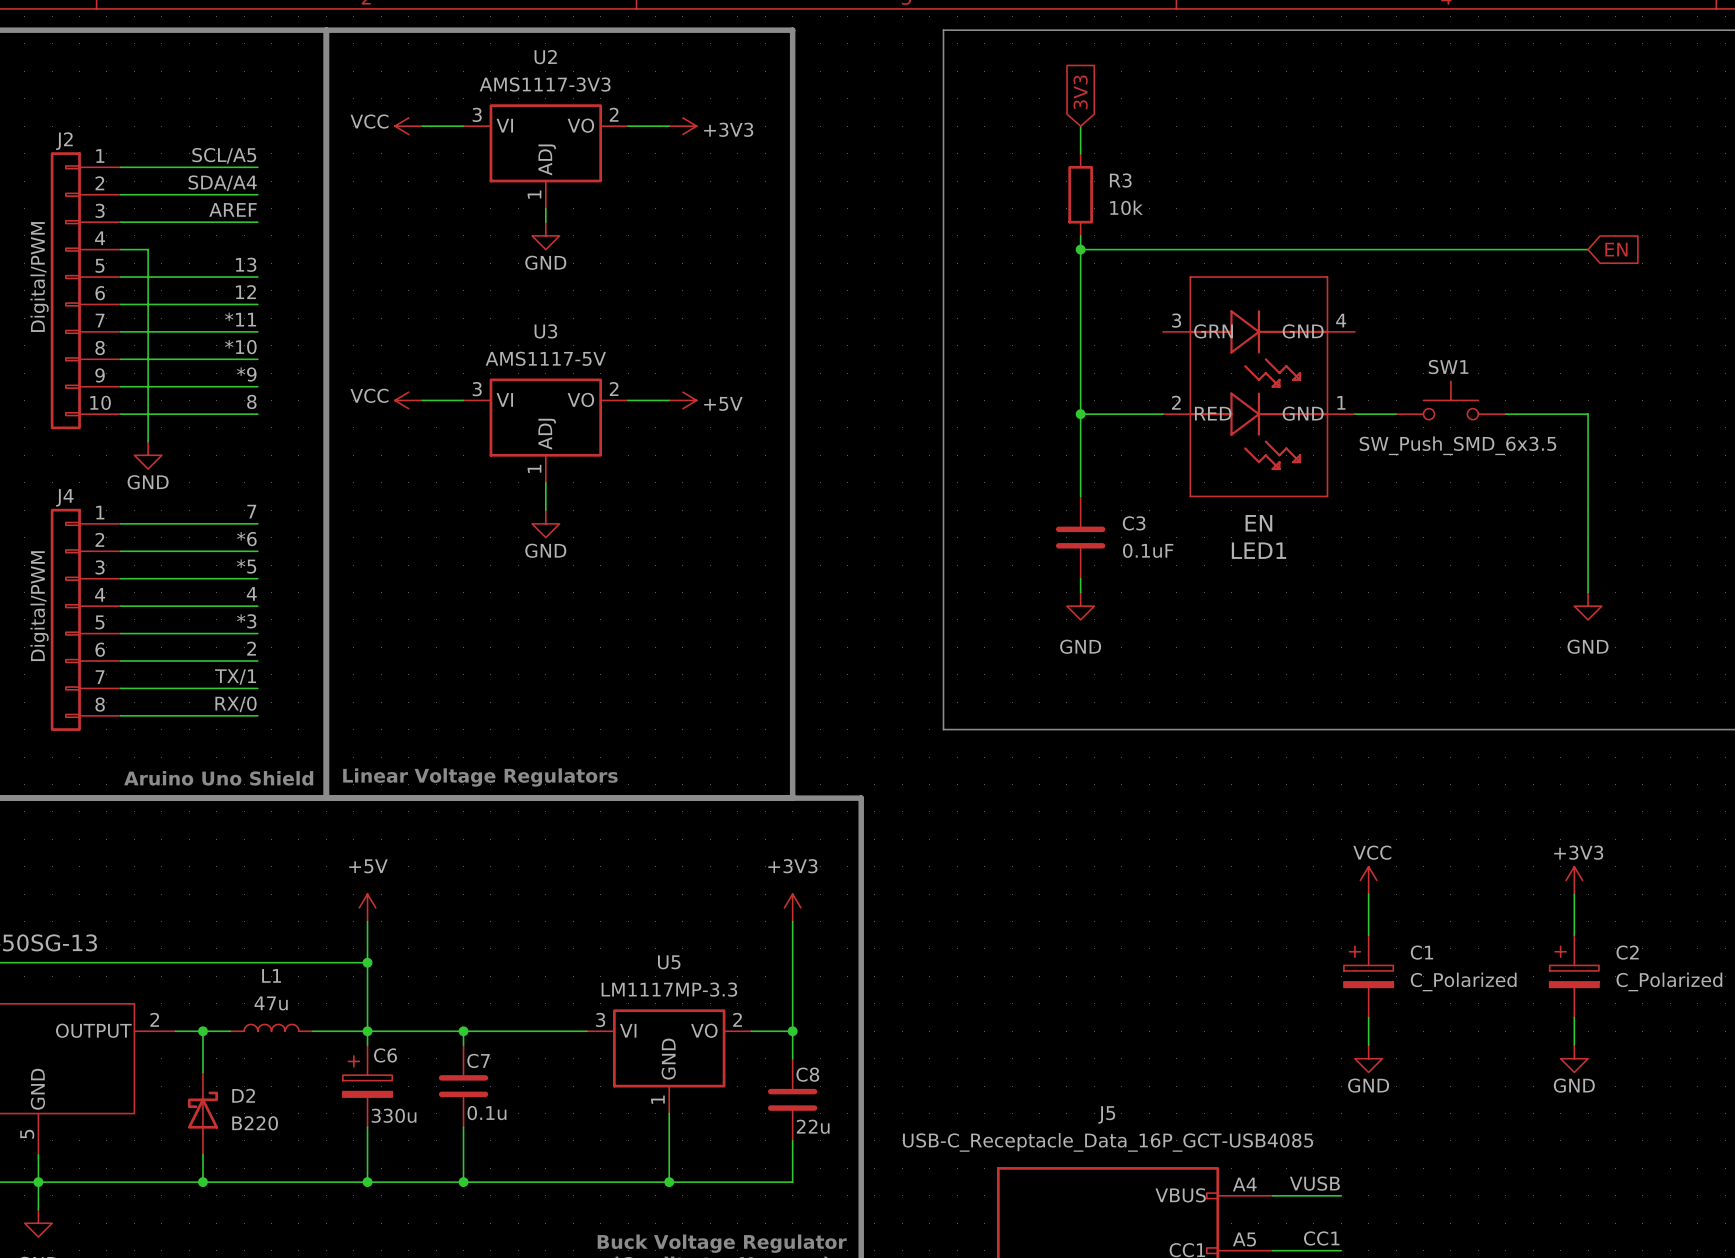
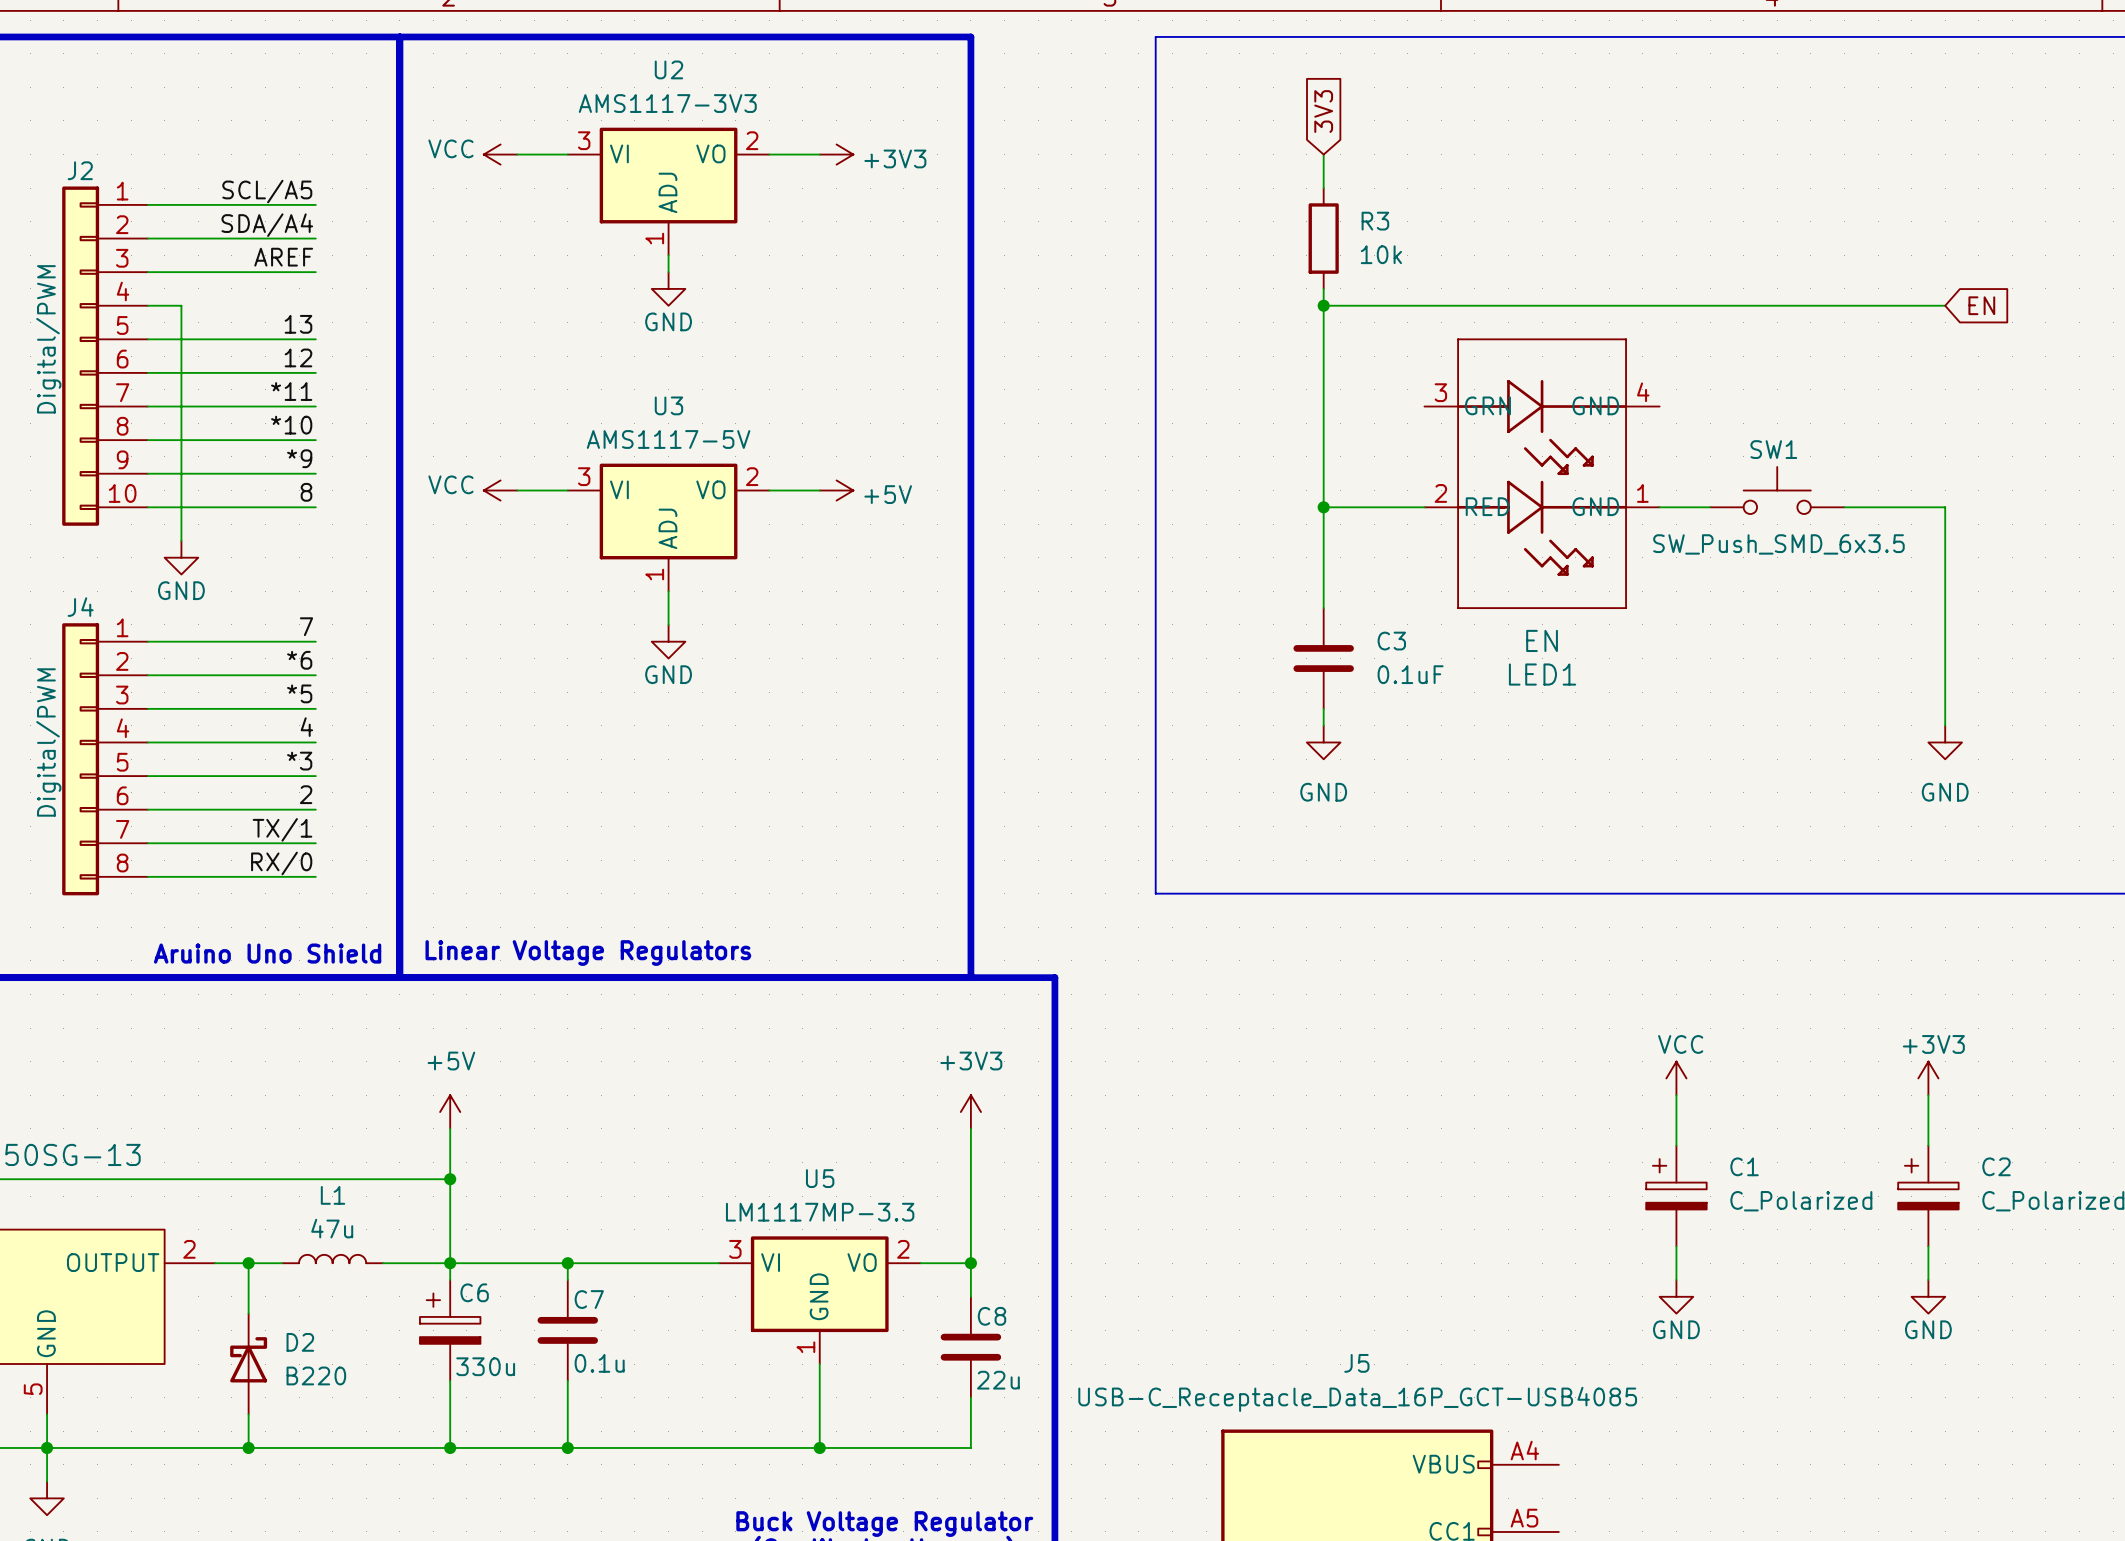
label: VUSB (1314, 1183) -> none
wire: (1272, 1195) (1341, 1195) -> none
label: CC1 (1321, 1238) -> none
wire: (1272, 1250) (1341, 1250) -> none

